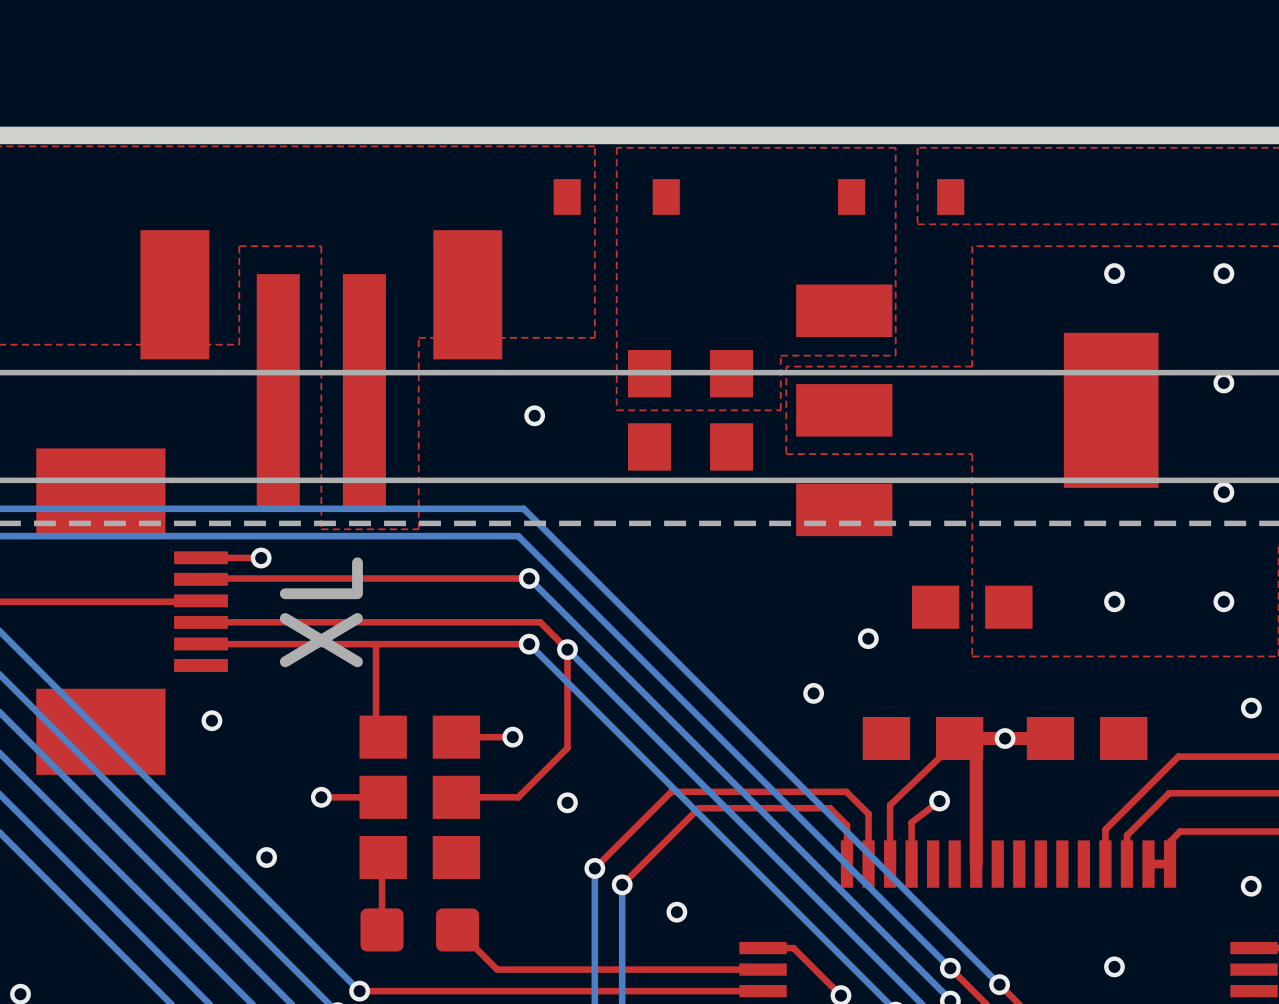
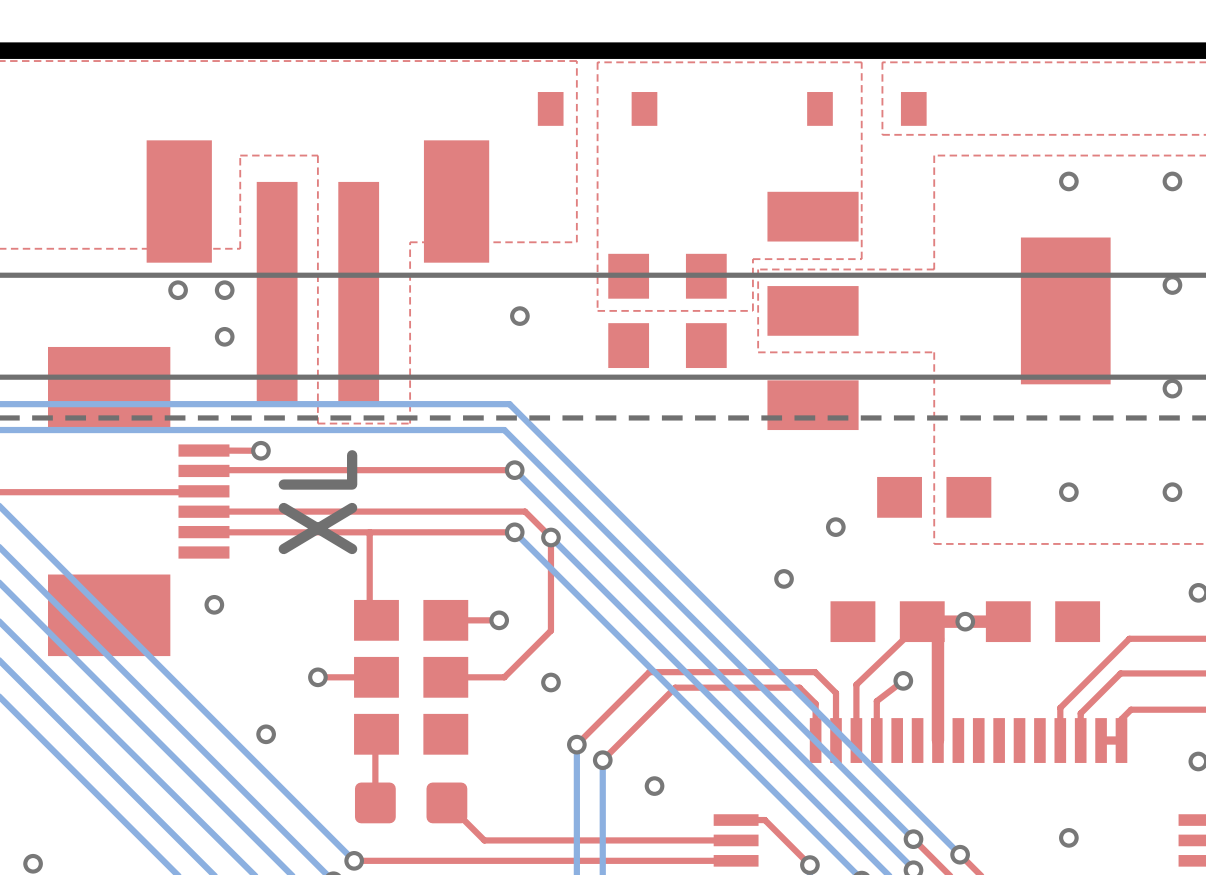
via: none -> (178, 290)
via: none -> (224, 290)
via: none -> (224, 336)

